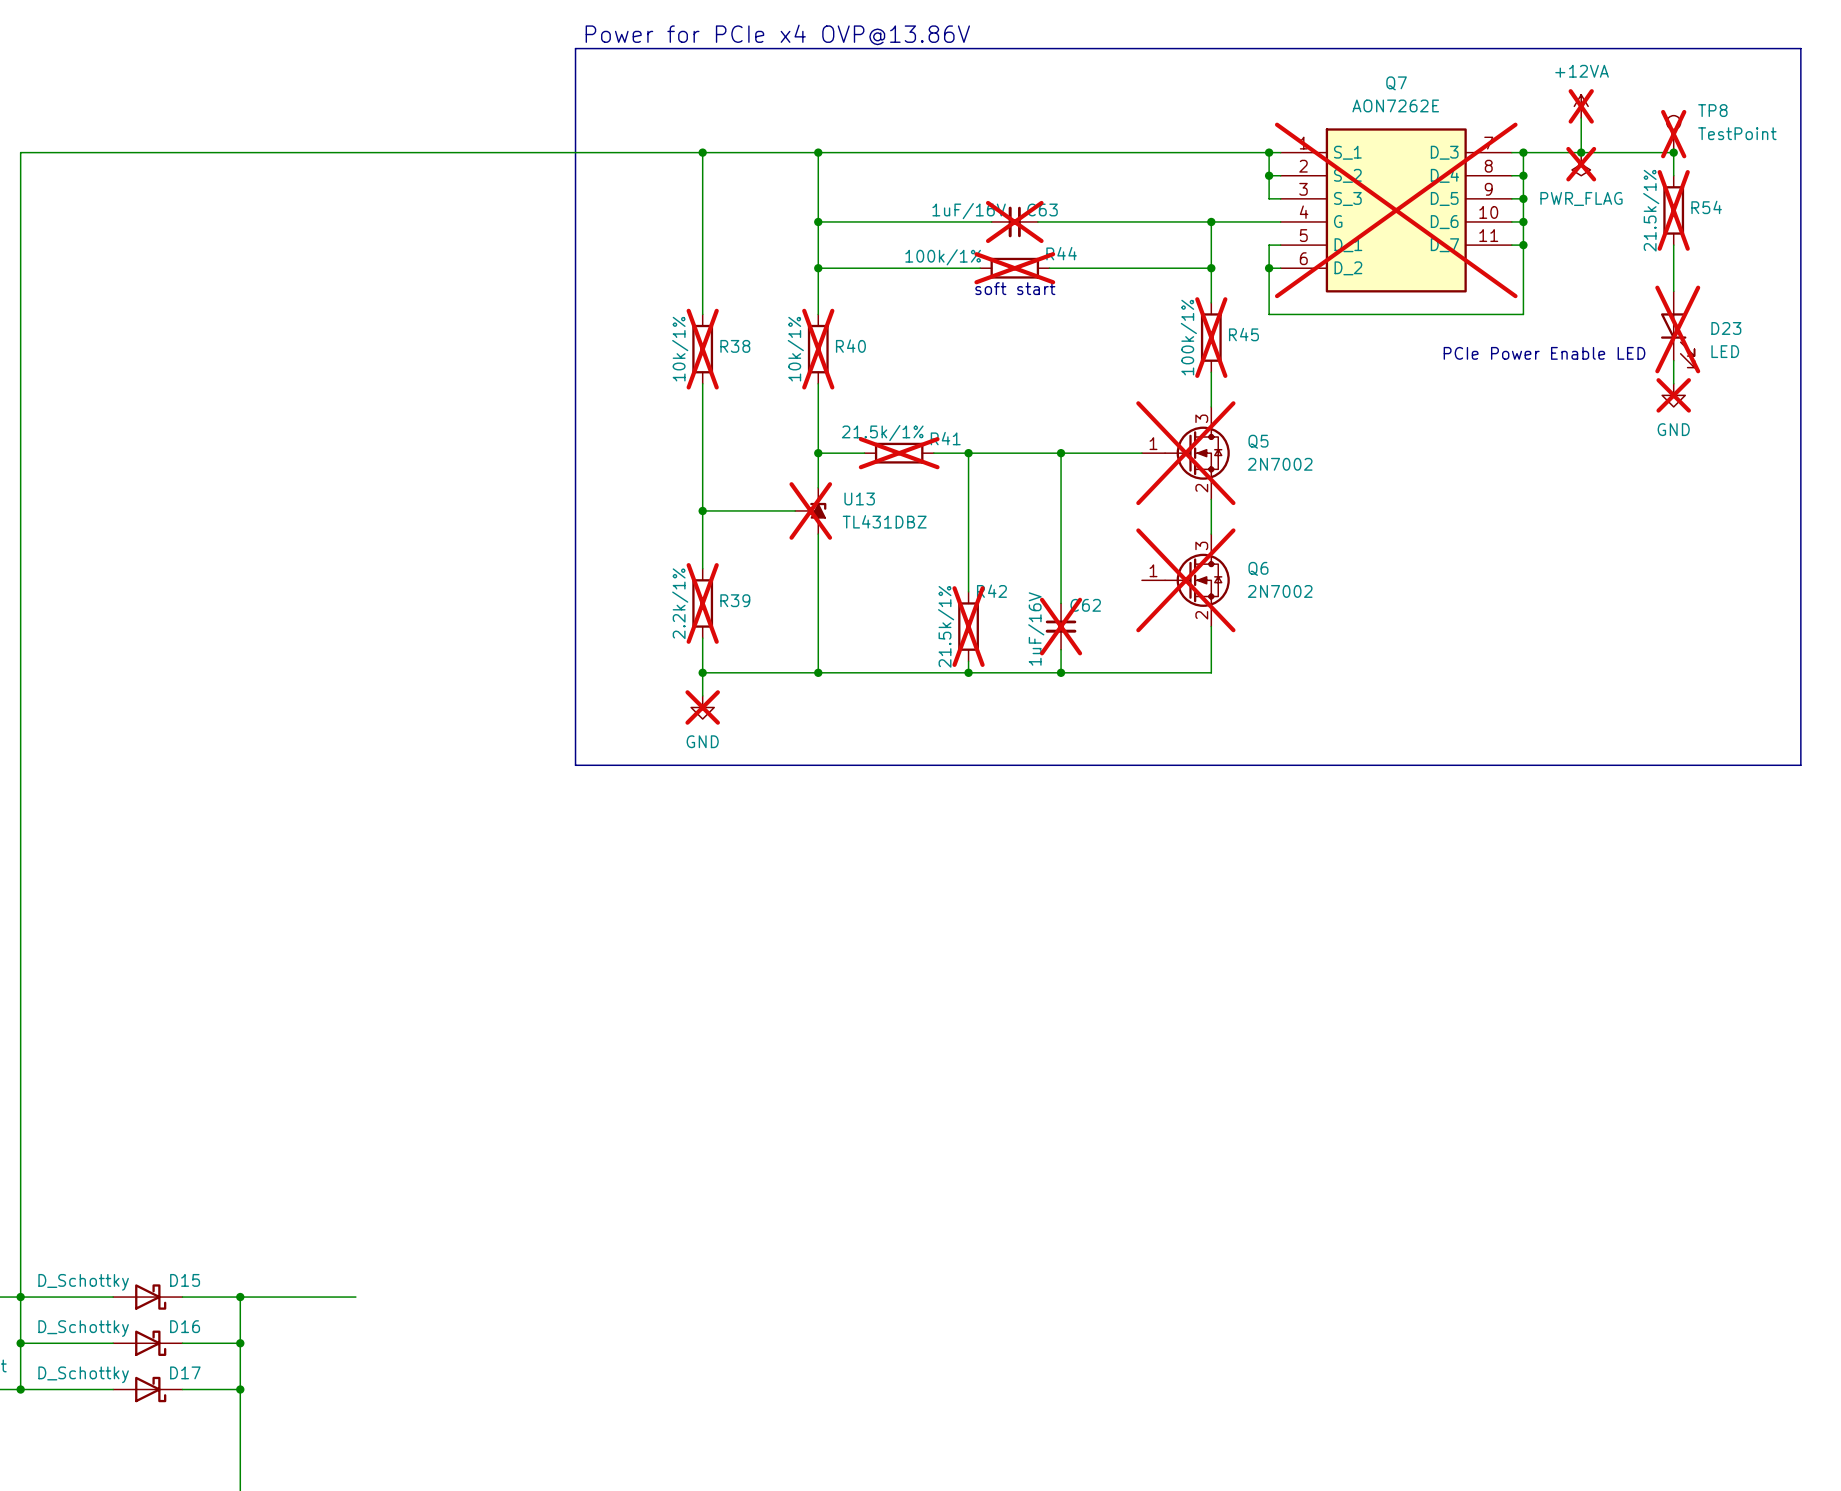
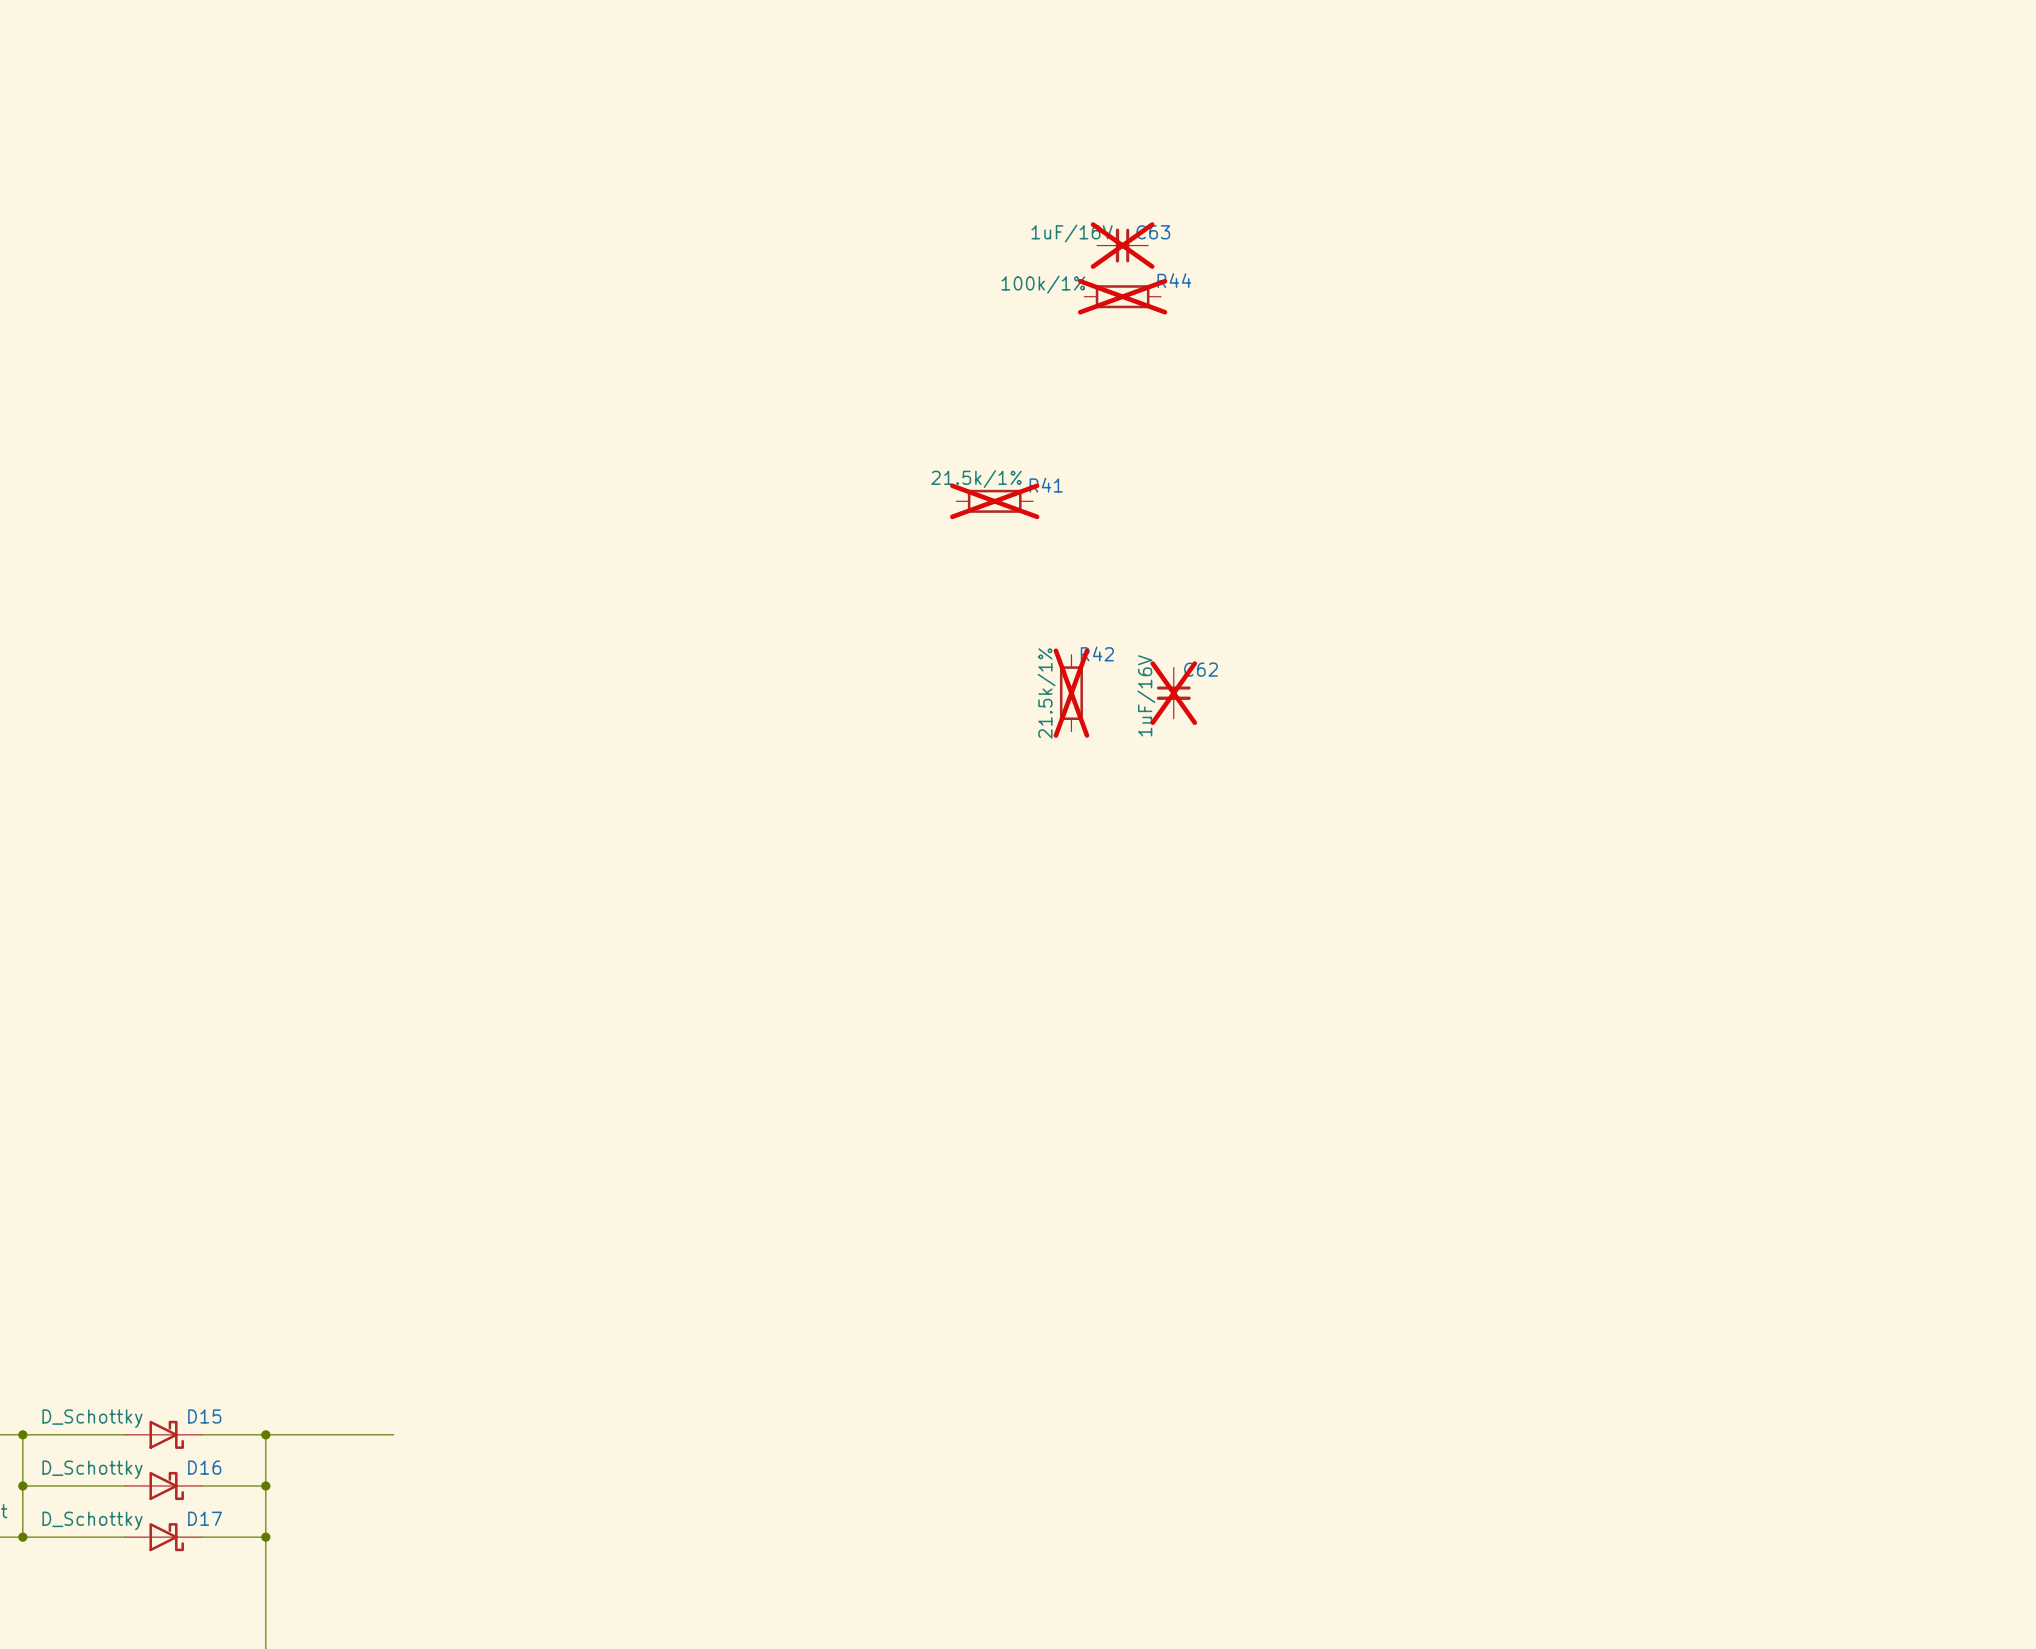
text: Power for PCIe x4 OVP@13.86V (777, 34) -> none
line: (575, 48) (1800, 48) (1800, 765) (575, 765) (575, 48) -> none
power symbol: +12VA (1581, 106) -> none
wire: (1581, 117) (1581, 152) -> none
TP8: TestPoint (1673, 134) -> none
wire: (702, 152) (702, 314) -> none
junction: (702, 152) -> none
wire: (818, 152) (818, 314) -> none
junction: (818, 152) -> none
wire: (1269, 152) (1269, 198) (1280, 198) -> none
junction: (1269, 152) -> none
wire: (1280, 152) (20, 152) (20, 1297) -> none
wire: (1511, 152) (1673, 152) (1673, 175) -> none
wire: (1523, 152) (1523, 314) (1269, 314) (1269, 245) (1280, 245) -> none
junction: (1523, 152) -> none
junction: (1581, 152) -> none
junction: (1673, 152) -> none
power symbol: PWR_FLAG (1581, 164) -> none
wire: (1269, 175) (1280, 175) -> none
junction: (1269, 175) -> none
wire: (1511, 175) (1523, 175) -> none
junction: (1523, 175) -> none
wire: (1511, 198) (1523, 198) -> none
junction: (1523, 198) -> none
Q7: AON7262E (1396, 210) -> none
R54: 21.5k/1% (1673, 210) -> none
wire: (818, 221) (991, 221) -> none
junction: (818, 221) -> none
wire: (1037, 221) (1280, 221) -> none
wire: (1211, 221) (1211, 302) -> none
junction: (1211, 221) -> none
wire: (1511, 221) (1523, 221) -> none
junction: (1523, 221) -> none
wire: (1511, 245) (1523, 245) -> none
junction: (1523, 245) -> none
wire: (1673, 245) (1673, 291) -> none
wire: (818, 268) (980, 268) -> none
junction: (818, 268) -> none
wire: (1049, 268) (1211, 268) -> none
junction: (1211, 268) -> none
wire: (1269, 268) (1280, 268) -> none
junction: (1269, 268) -> none
text: soft start (1015, 288) -> none
D23: LED (1677, 329) -> none
R45: 100k/1% (1211, 337) -> none
R38: 10k/1% (702, 349) -> none
R40: 10k/1% (818, 349) -> none
text: PCIe Power Enable LED (1544, 353) -> none
wire: (1673, 360) (1673, 383) -> none
wire: (1211, 372) (1211, 406) -> none
wire: (702, 383) (702, 568) -> none
wire: (818, 383) (818, 487) -> none
power symbol: GND (1673, 395) -> none
wire: (818, 453) (864, 453) -> none
junction: (818, 453) -> none
wire: (933, 453) (1141, 453) -> none
wire: (968, 453) (968, 591) -> none
junction: (968, 453) -> none
wire: (1061, 453) (1061, 603) -> none
junction: (1061, 453) -> none
Q5: 2N7002 (1185, 453) -> none
wire: (1211, 499) (1211, 534) -> none
wire: (702, 510) (795, 510) -> none
junction: (702, 510) -> none
U13: TL431DBZ (810, 510) -> none
wire: (818, 534) (818, 672) -> none
Q6: 2N7002 (1185, 580) -> none
R39: 2.2k/1% (702, 603) -> none
wire: (1211, 626) (1211, 672) (702, 672) -> none
wire: (702, 638) (702, 695) -> none
wire: (1061, 649) (1061, 672) -> none
wire: (968, 661) (968, 672) -> none
junction: (702, 672) -> none
junction: (818, 672) -> none
junction: (968, 672) -> none
junction: (1061, 672) -> none
power symbol: GND (702, 707) -> none

